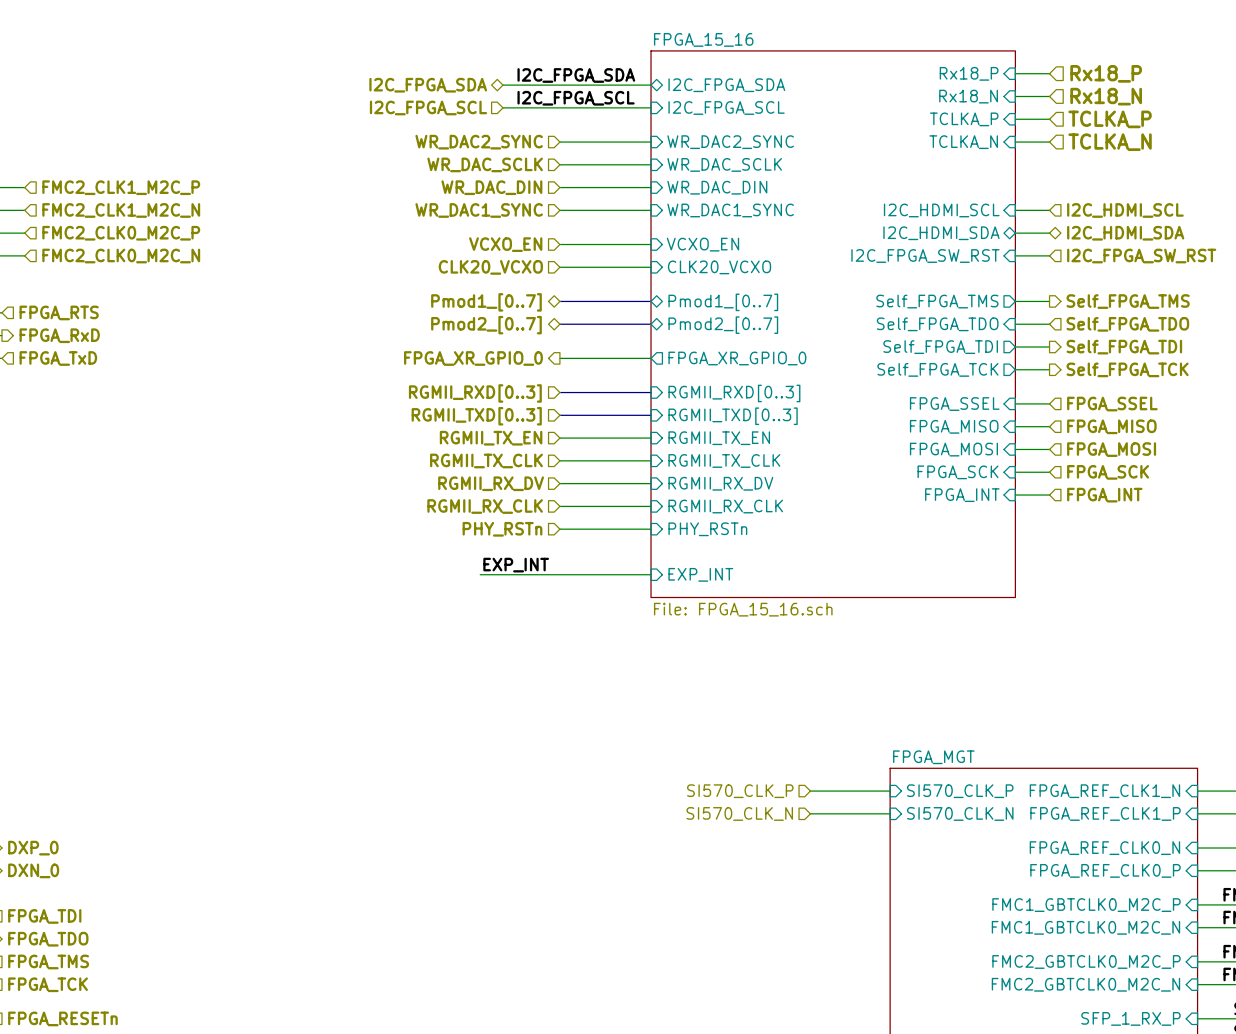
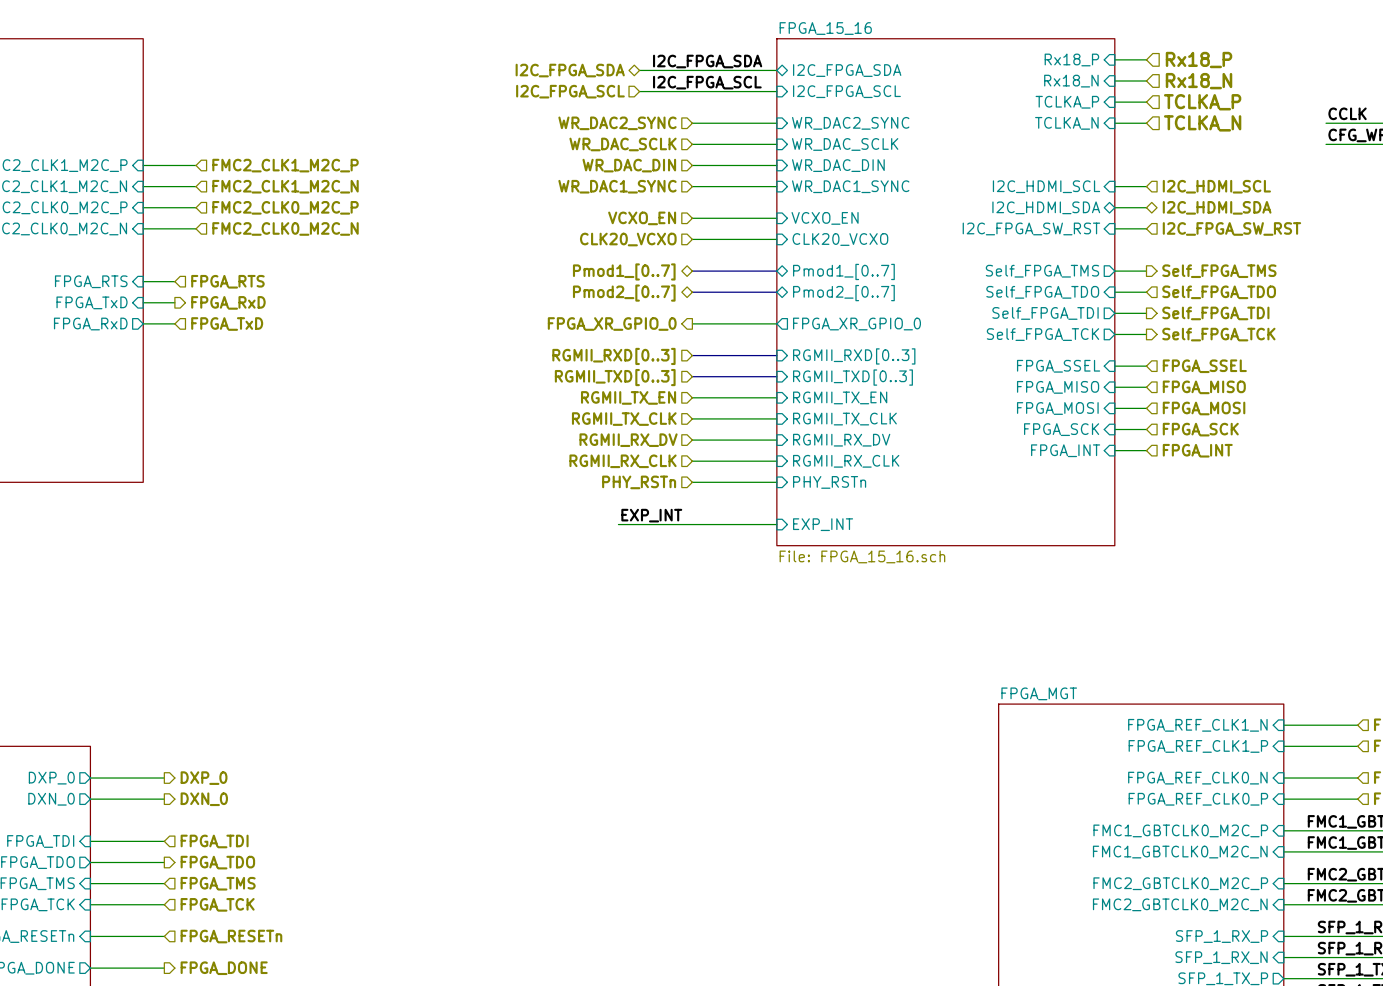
hierarchical label: SI570_CLK_P (740, 791) -> none
wire: (810, 791) (890, 791) -> none
sheet pin: SI570_CLK_P (960, 791) -> none
hierarchical label: SI570_CLK_N (739, 813) -> none
wire: (810, 813) (890, 813) -> none
sheet pin: SI570_CLK_N (960, 813) -> none

